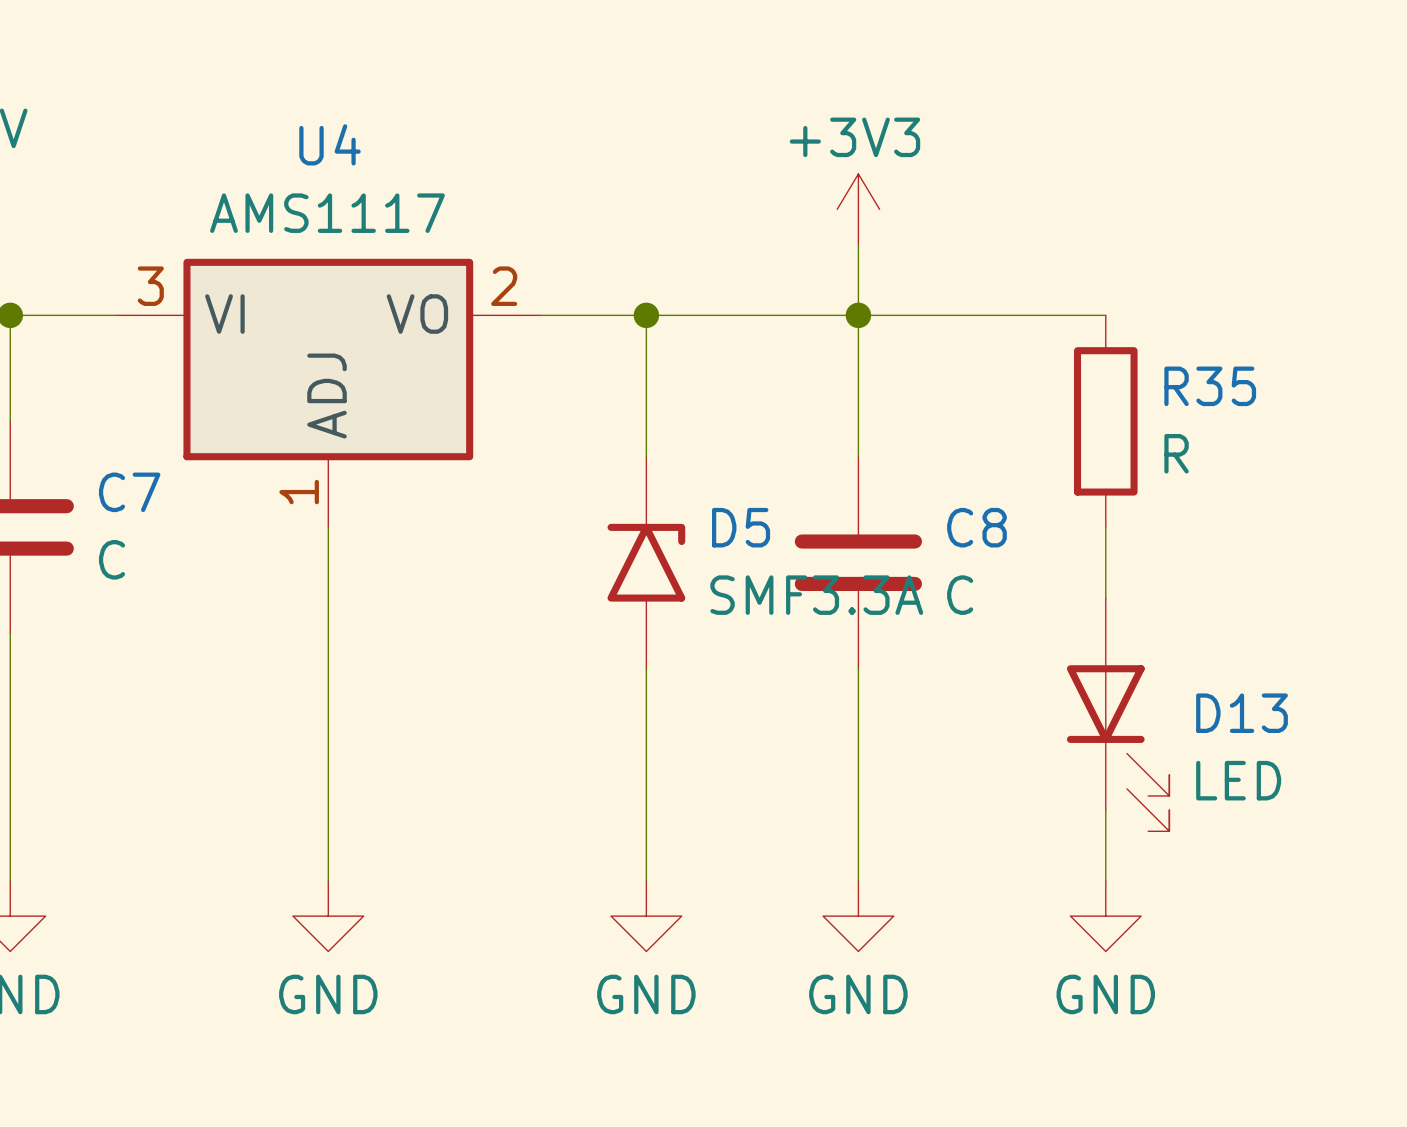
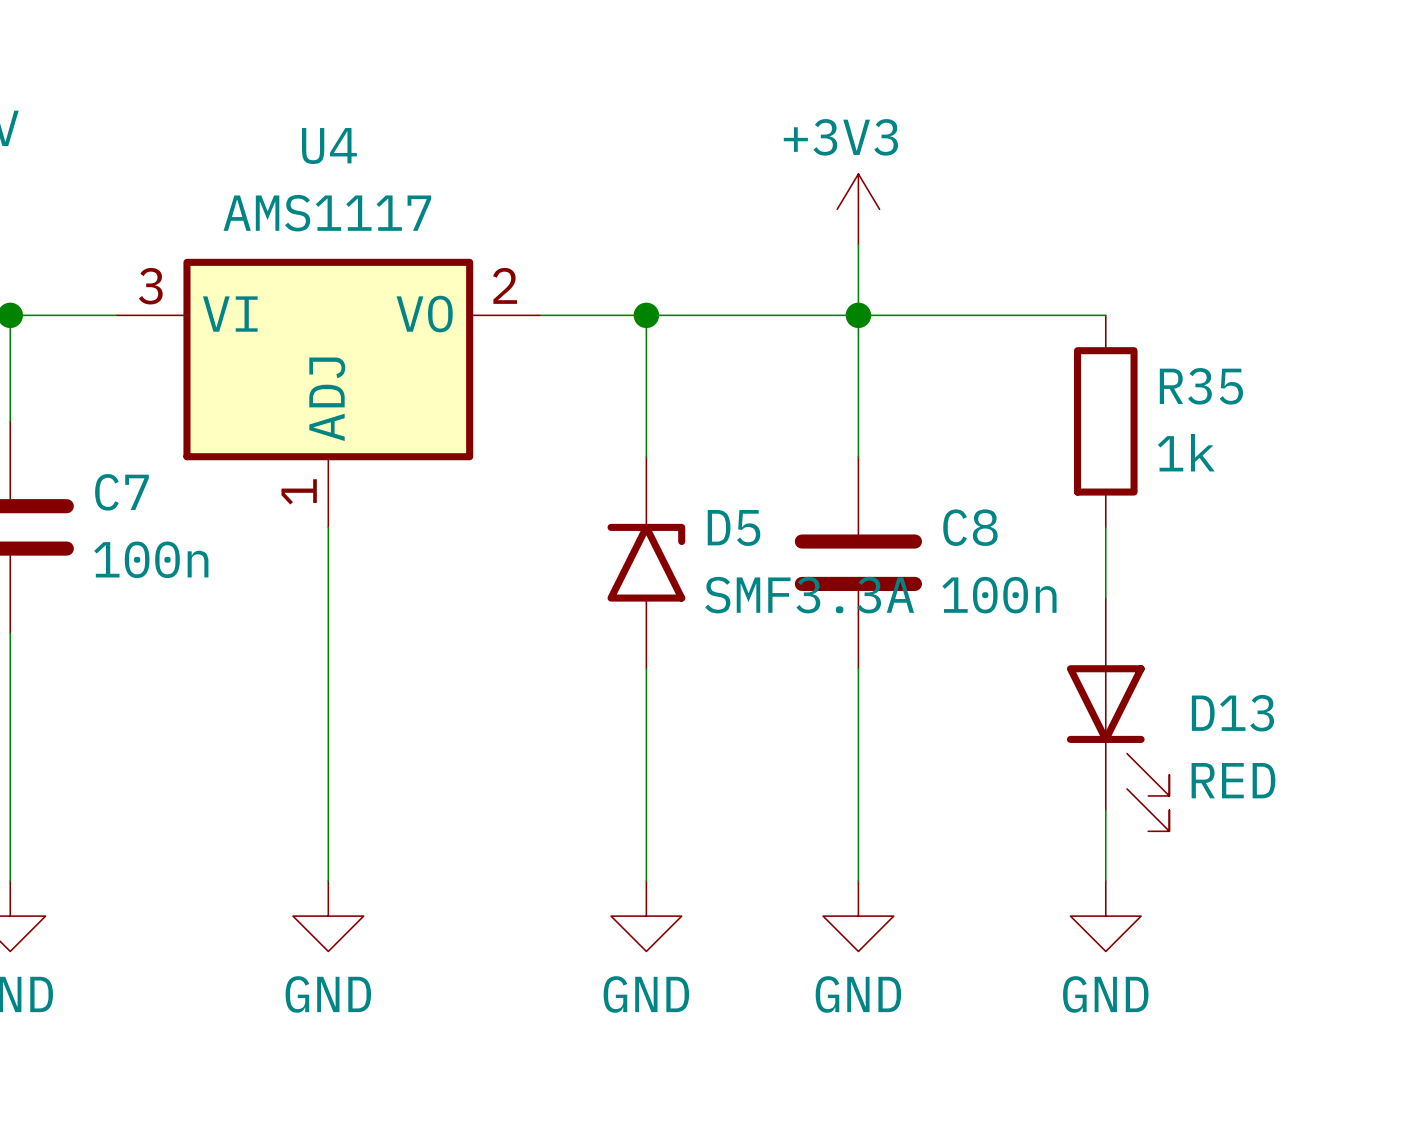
R35 value: R (1176, 453) -> 1k (1186, 452)
C7 value: C (112, 559) -> 100n (151, 559)
C8 value: C (960, 595) -> 100n (999, 595)
D13 value: LED (1238, 780) -> RED (1233, 780)

